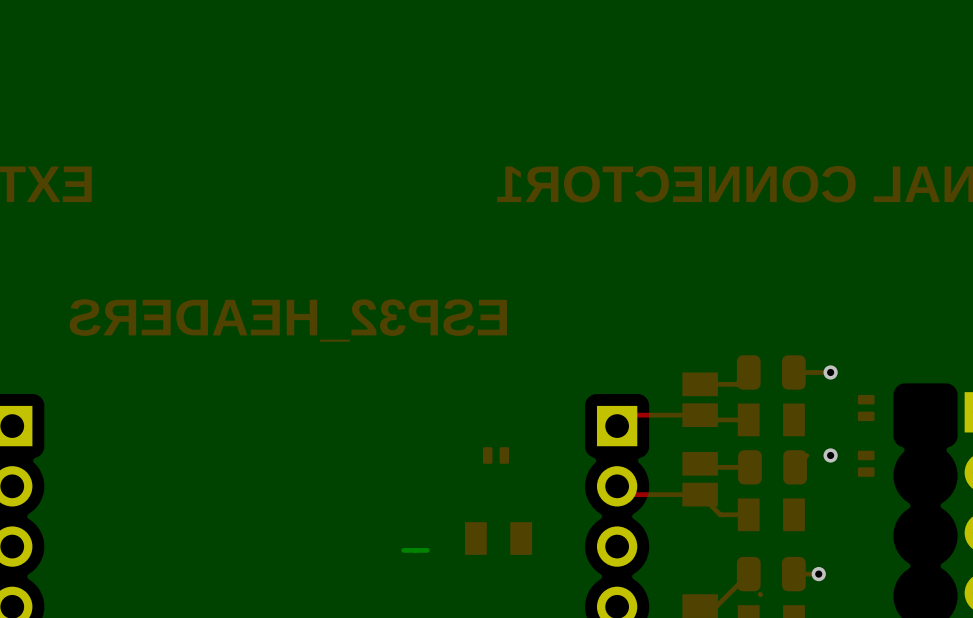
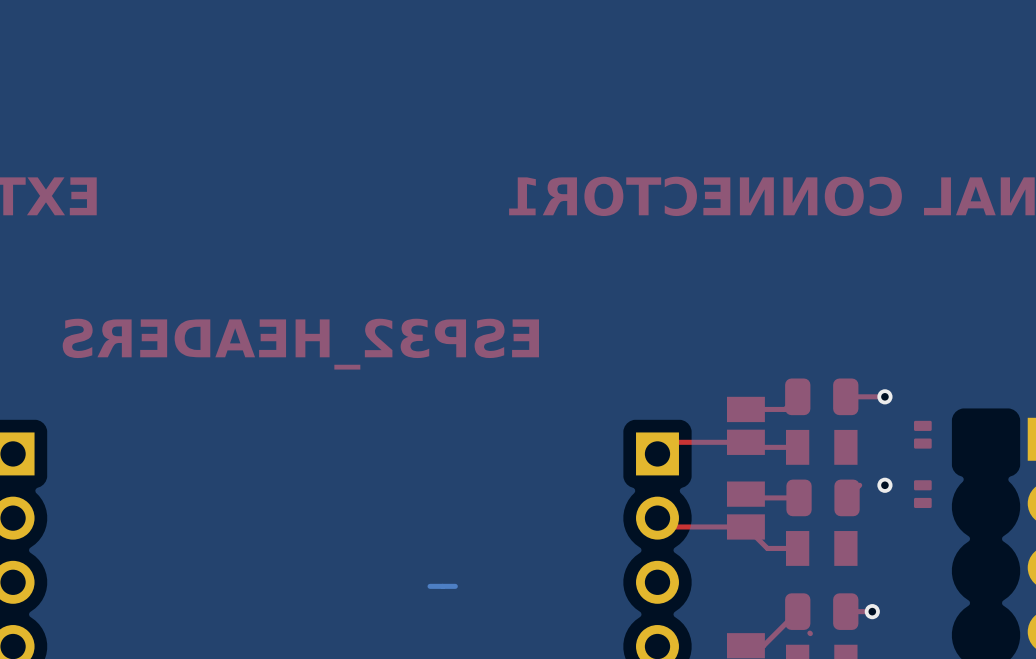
part: (496, 455) -> none
part: (498, 538) -> none

